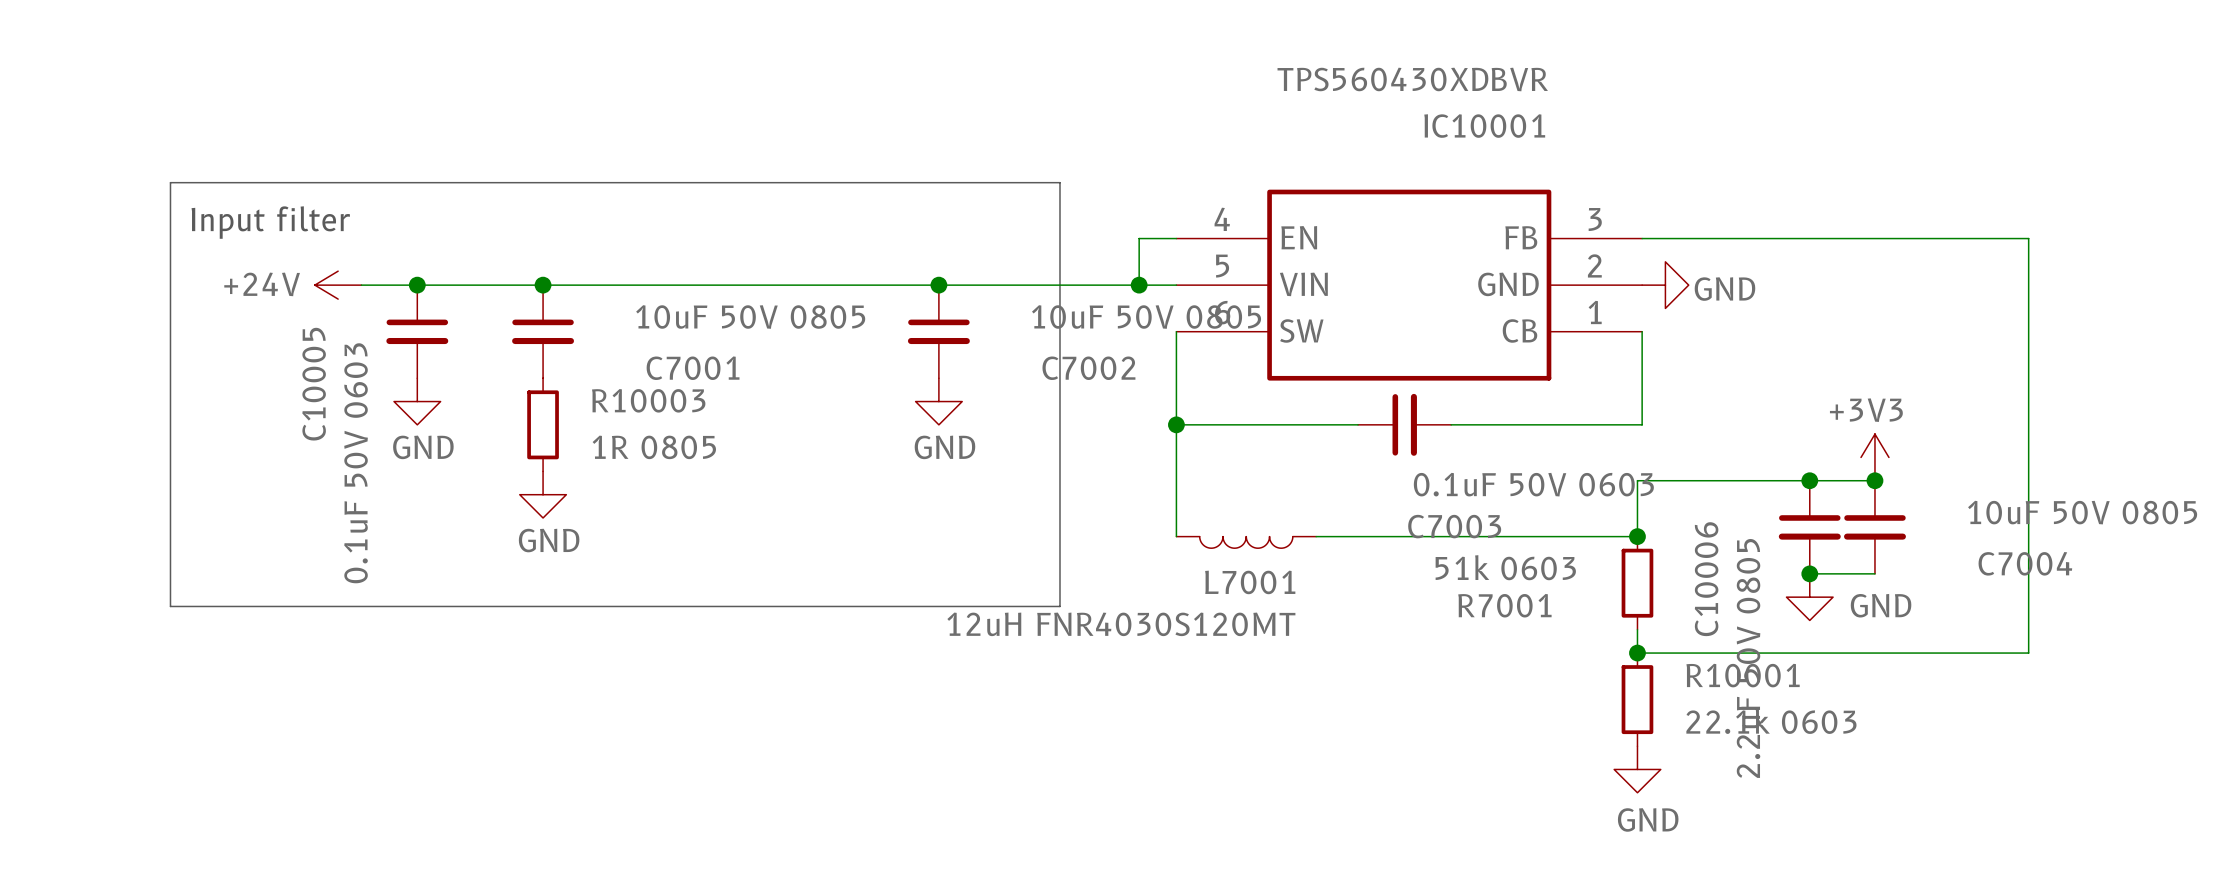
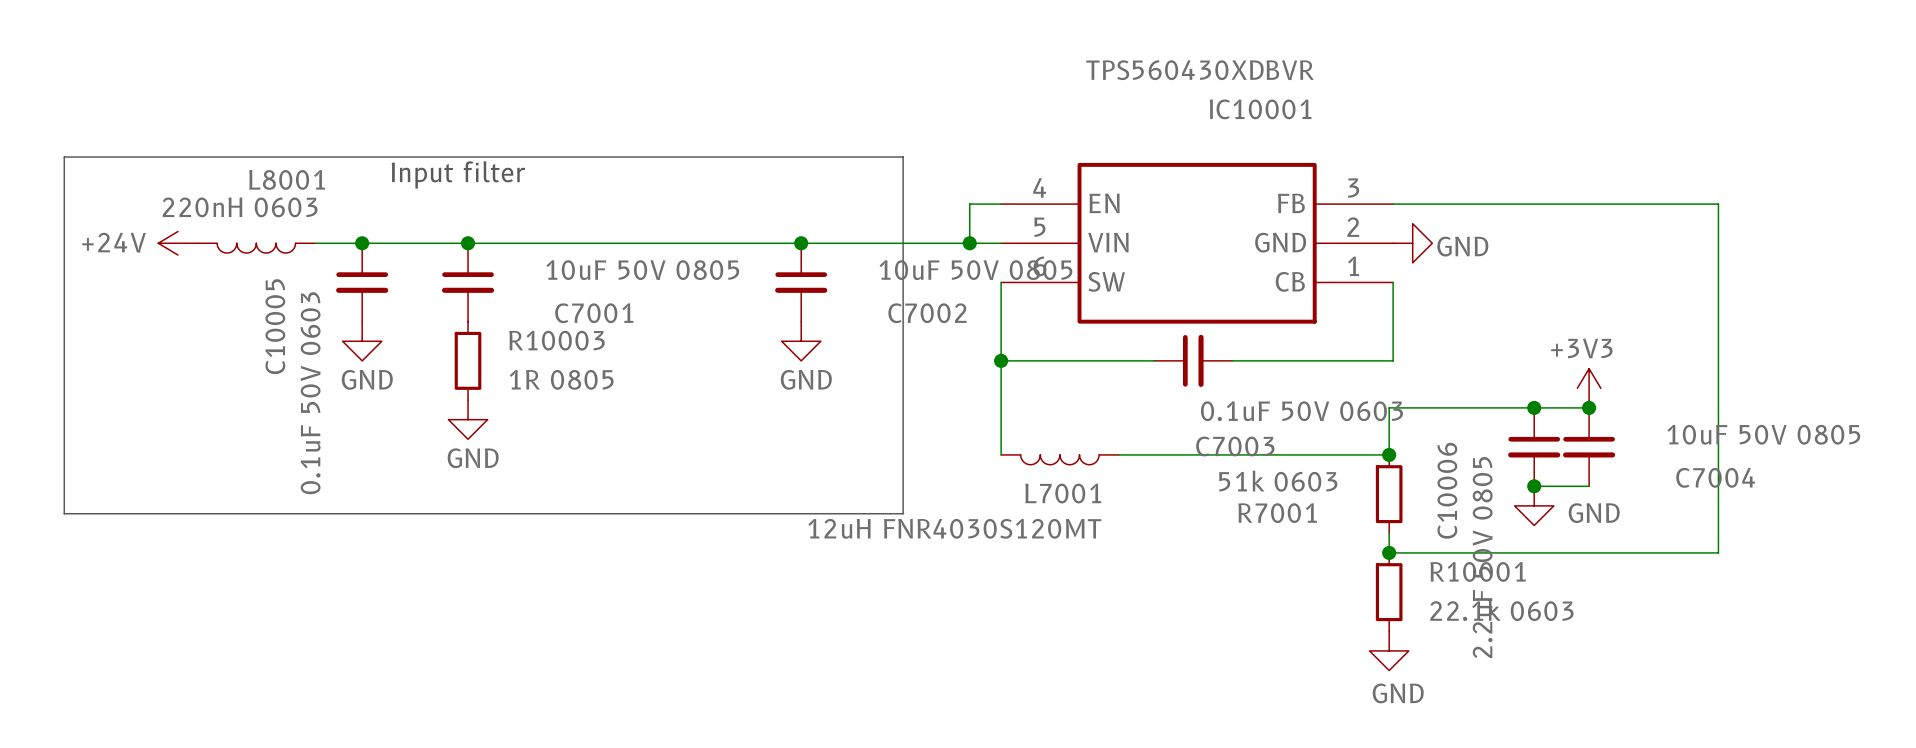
line: (170, 182) (170, 606) -> (154, 157) (64, 157) (64, 513) (154, 513)
text position: Input filter (270, 222) -> Input filter (458, 174)
power symbol position: +24V (338, 285) -> +24V (177, 243)
L8001: none -> 220nH 0603 (256, 248)

